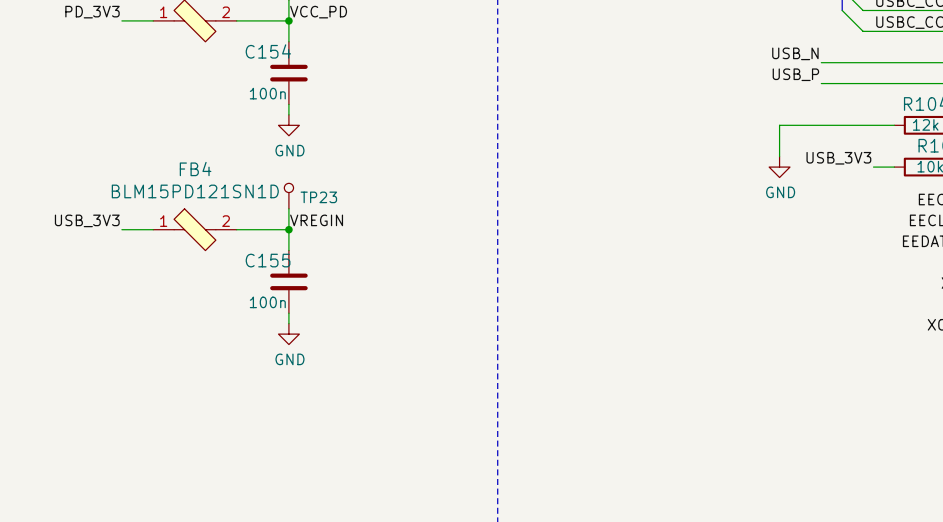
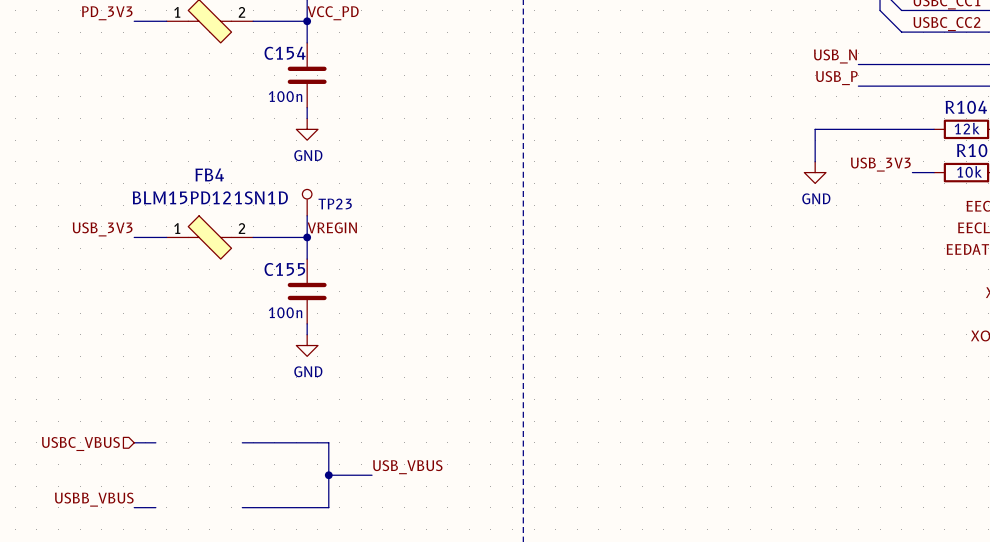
hierarchical label: none -> USBC_VBUS (80, 444)
wire: none -> (134, 442) (155, 442)
wire: none -> (242, 442) (328, 442) (328, 507) (242, 507)
label: none -> USB_VBUS (407, 467)
wire: none -> (328, 475) (372, 475)
junction: none -> (328, 475)
label: none -> USBB_VBUS (94, 499)
wire: none -> (134, 507) (155, 507)

